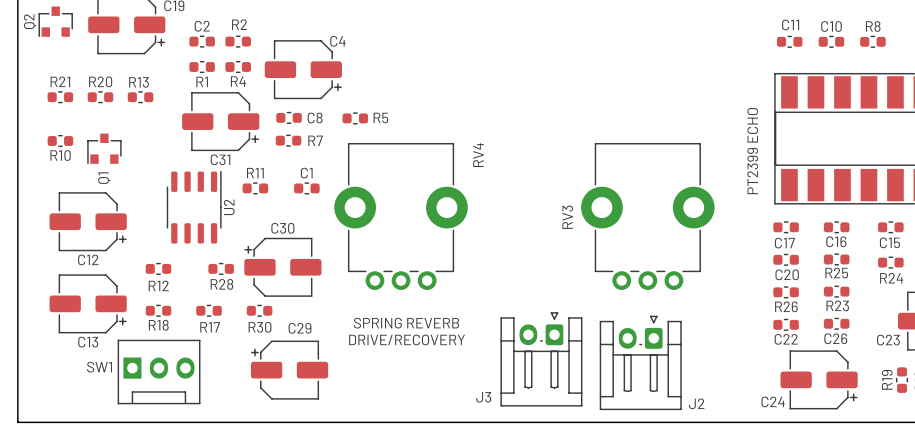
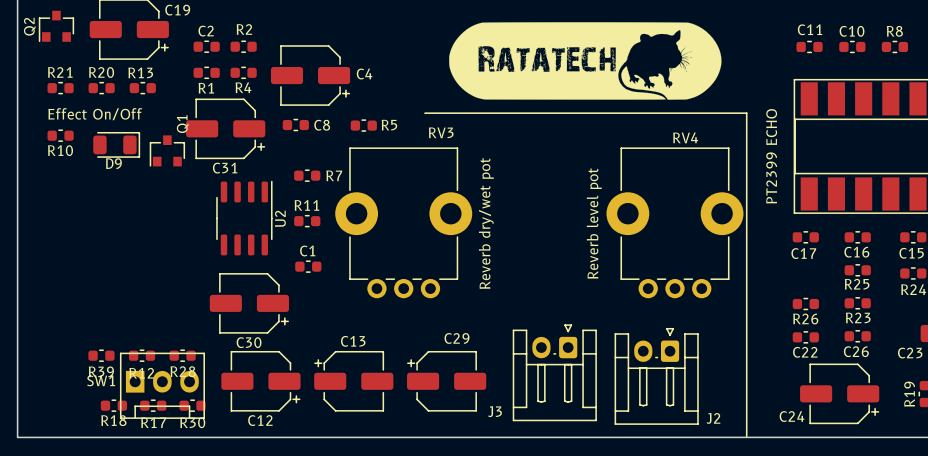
drawing: none -> [449, 22, 722, 100]
C4 name position: C4 (337, 41) -> C4 (364, 74)
R21 position: (60, 97) -> (60, 88)
R20 position: (100, 97) -> (101, 88)
R13 position: (140, 97) -> (142, 88)
line: none -> (424, 113) (746, 113) (746, 436)
text: none -> Effect On/Off (95, 114)
D9: none -> (116, 144)
R10 position: (60, 140) -> (60, 135)
R7 position: (288, 140) -> (307, 175)
Q1 position: (104, 148) -> (167, 150)
RV4 name rotation: 0° (478, 155) -> 90° clockwise (685, 137)
RV4 name position: RV4 (478, 155) -> RV4 (685, 137)
Q1 name position: Q1 (104, 178) -> Q1 (182, 124)
R11 position: (255, 188) -> (307, 221)
C1 position: (306, 188) -> (308, 266)
U2 position: (194, 207) -> (244, 218)
text: none -> Reverb dry/wet pot (486, 223)
text: none -> Reverb level pot (594, 223)
RV4 position: (401, 216) -> (674, 222)
RV3 position: (647, 216) -> (403, 222)
RV3 name rotation: 0° (567, 217) -> 90° clockwise (441, 132)
RV3 name position: RV3 (567, 217) -> RV3 (441, 132)
C12 position: (88, 221) -> (260, 381)
C20: (786, 259) -> none
C30 rotation: 0° (282, 267) -> 180° (249, 303)
R12 position: (158, 268) -> (142, 355)
R28 position: (221, 268) -> (182, 355)
C13 rotation: 0° (88, 303) -> 180° (353, 381)
C13 position: (88, 303) -> (353, 381)
R18 position: (158, 310) -> (113, 405)
R17 position: (209, 310) -> (153, 405)
R30 position: (259, 310) -> (192, 405)
text: SPRING REVERB (406, 323) -> none
text: DRIVE/RECOVERY (407, 339) -> none
R39: none -> (101, 355)
C29 position: (289, 370) -> (446, 381)

